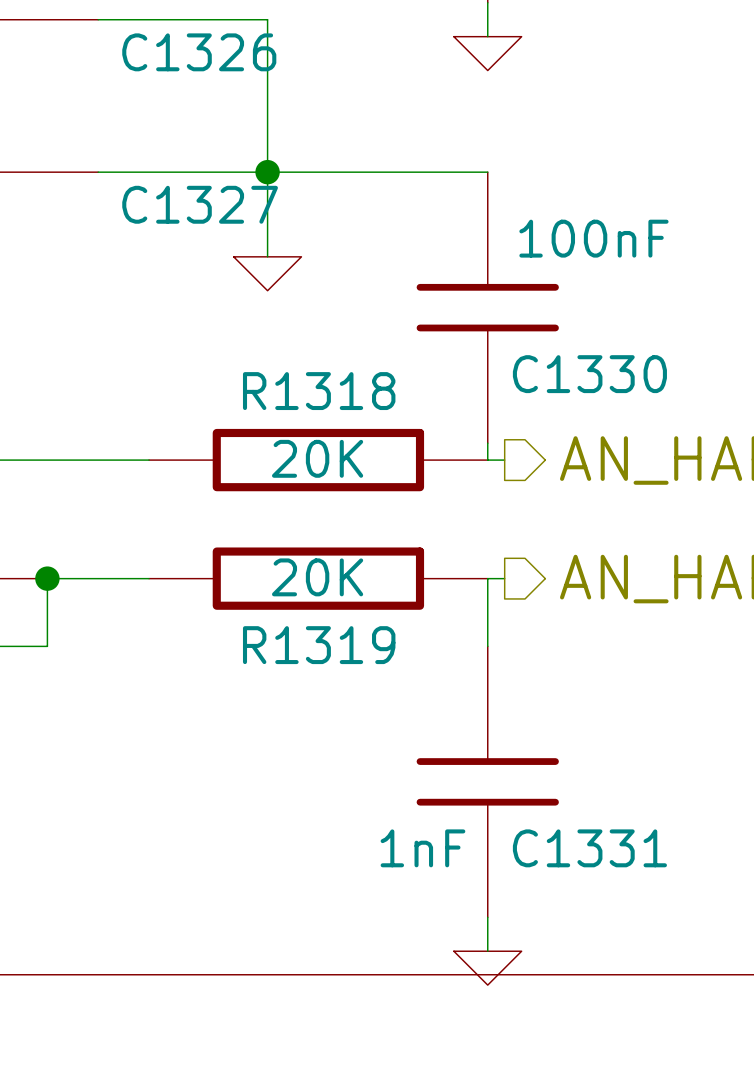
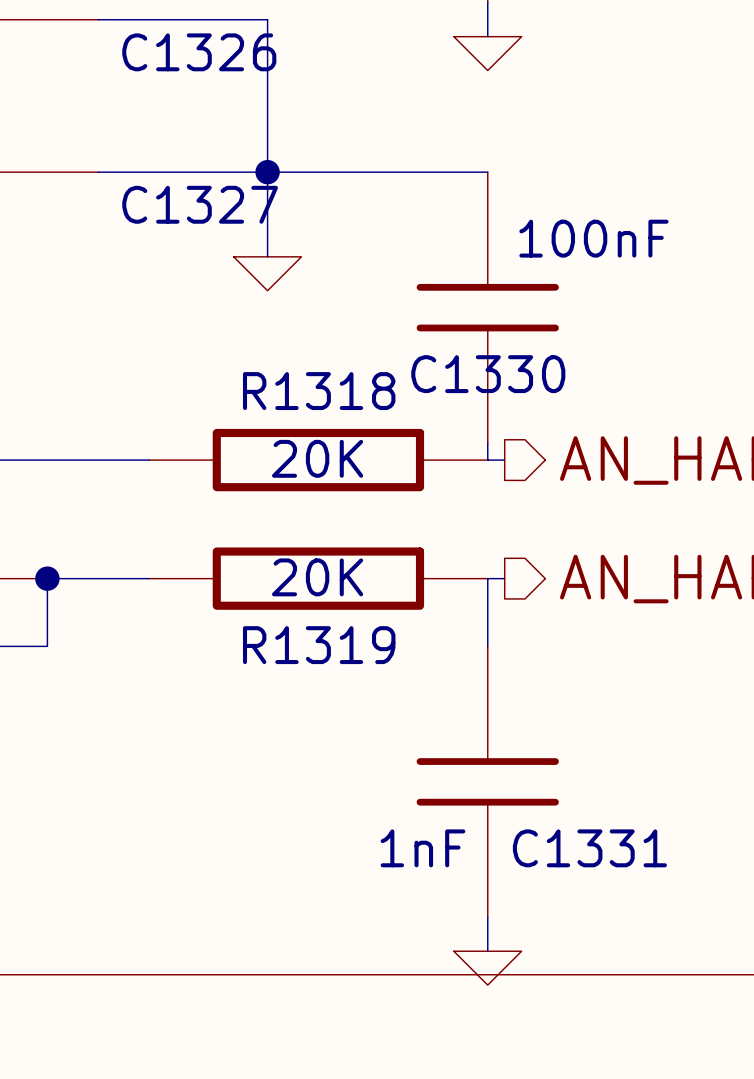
C1330 name position: C1330 (589, 374) -> C1330 (488, 374)

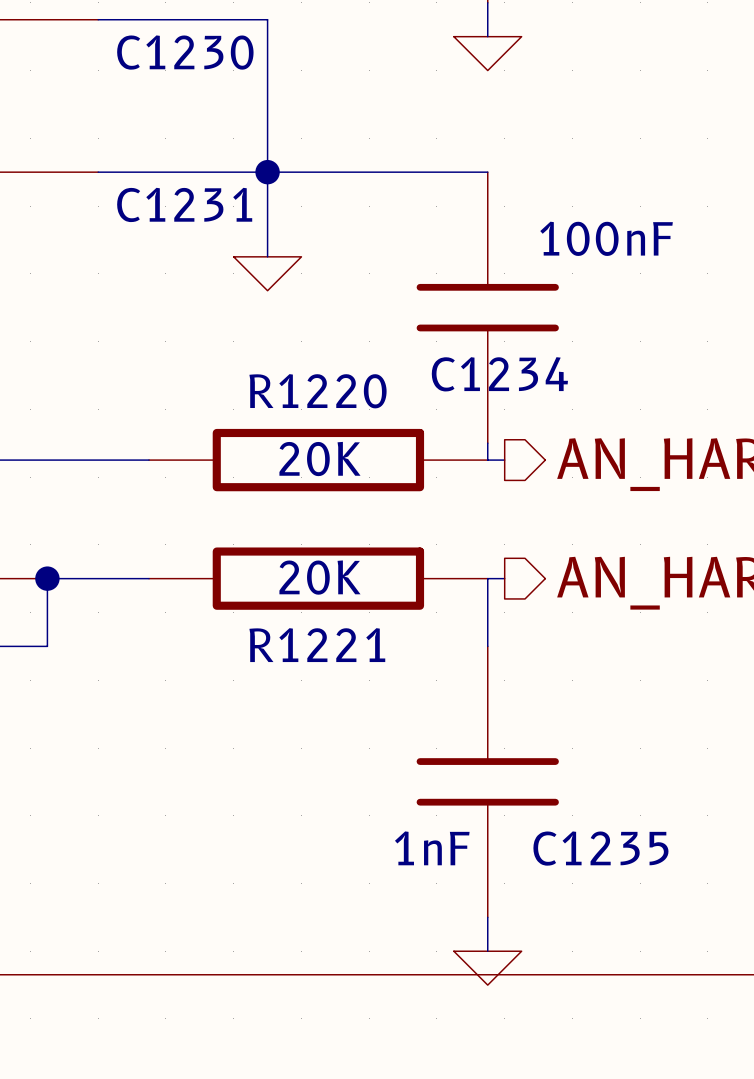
C1326 name: C1326 (199, 52) -> C1230 (185, 52)
C1327 name: C1327 (200, 204) -> C1231 (184, 204)
C1330 name: C1330 (488, 374) -> C1234 (499, 374)
R1318 name: R1318 (319, 391) -> R1220 (318, 391)
R1319 name: R1319 (319, 645) -> R1221 (317, 645)
C1331 name: C1331 (589, 848) -> C1235 (600, 848)

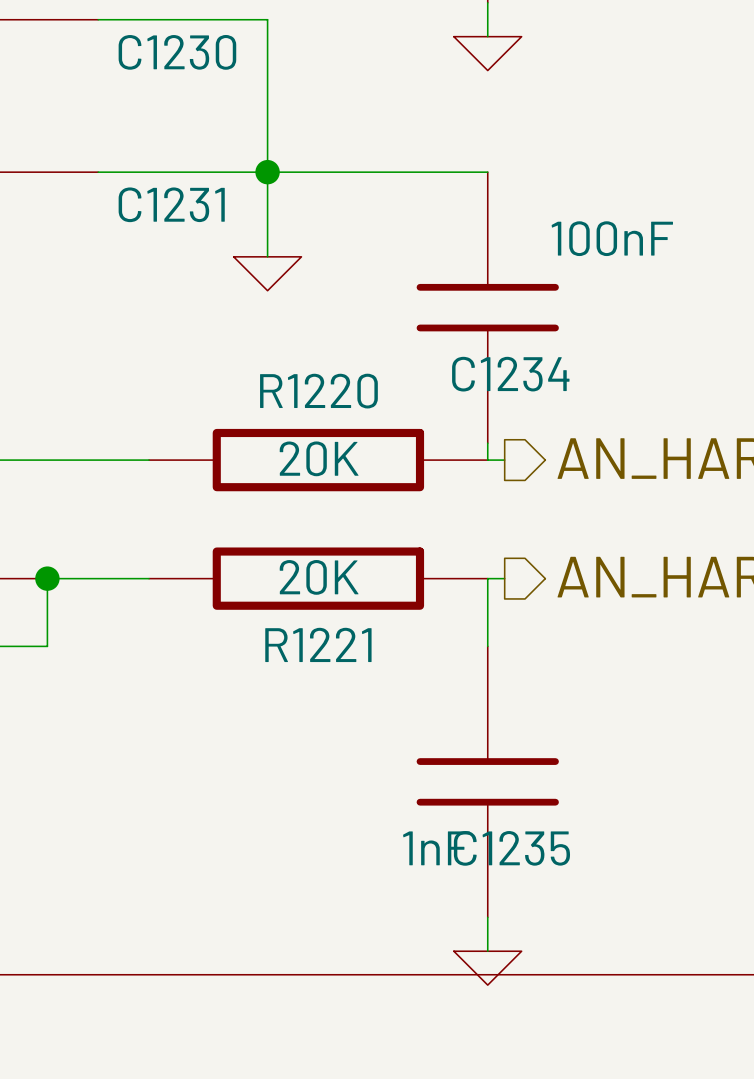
C1235 name position: C1235 (600, 848) -> C1235 (511, 848)

